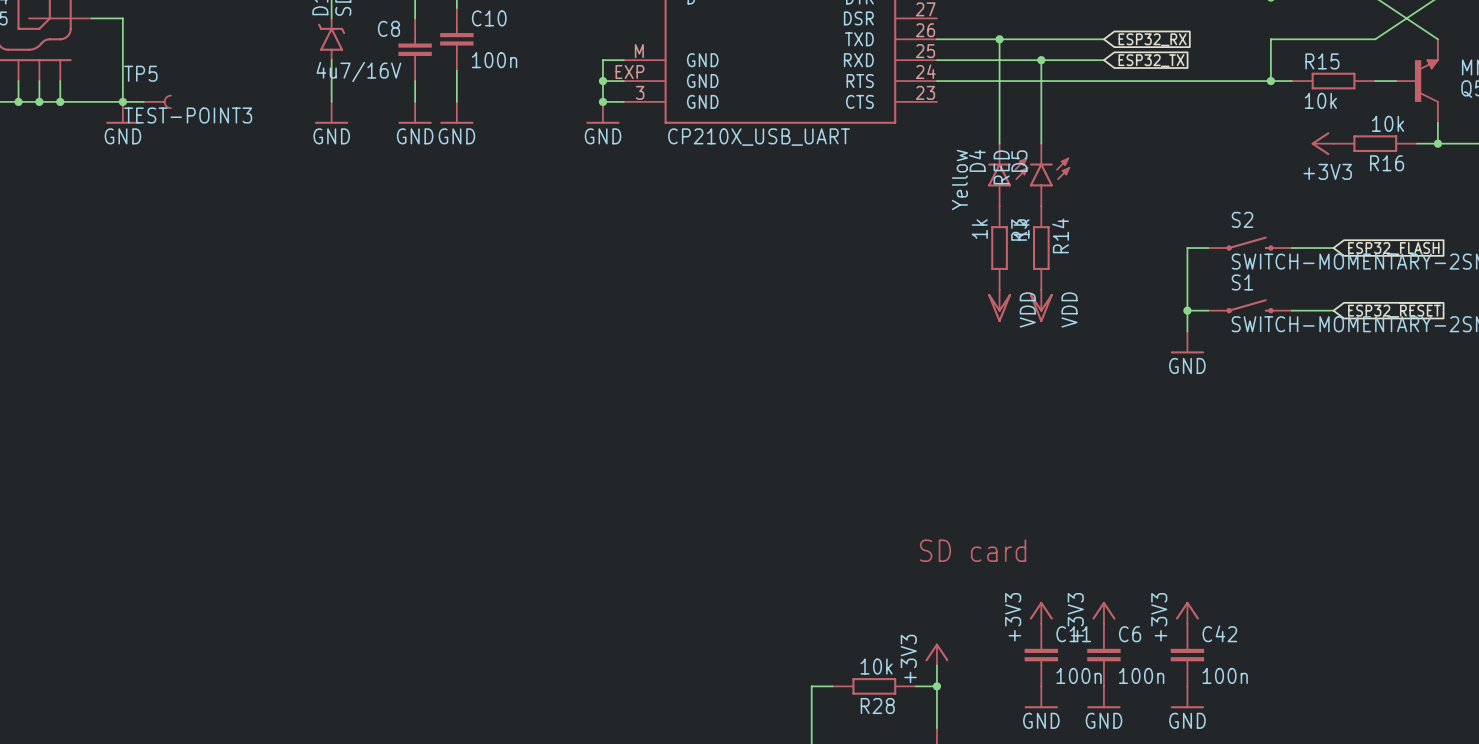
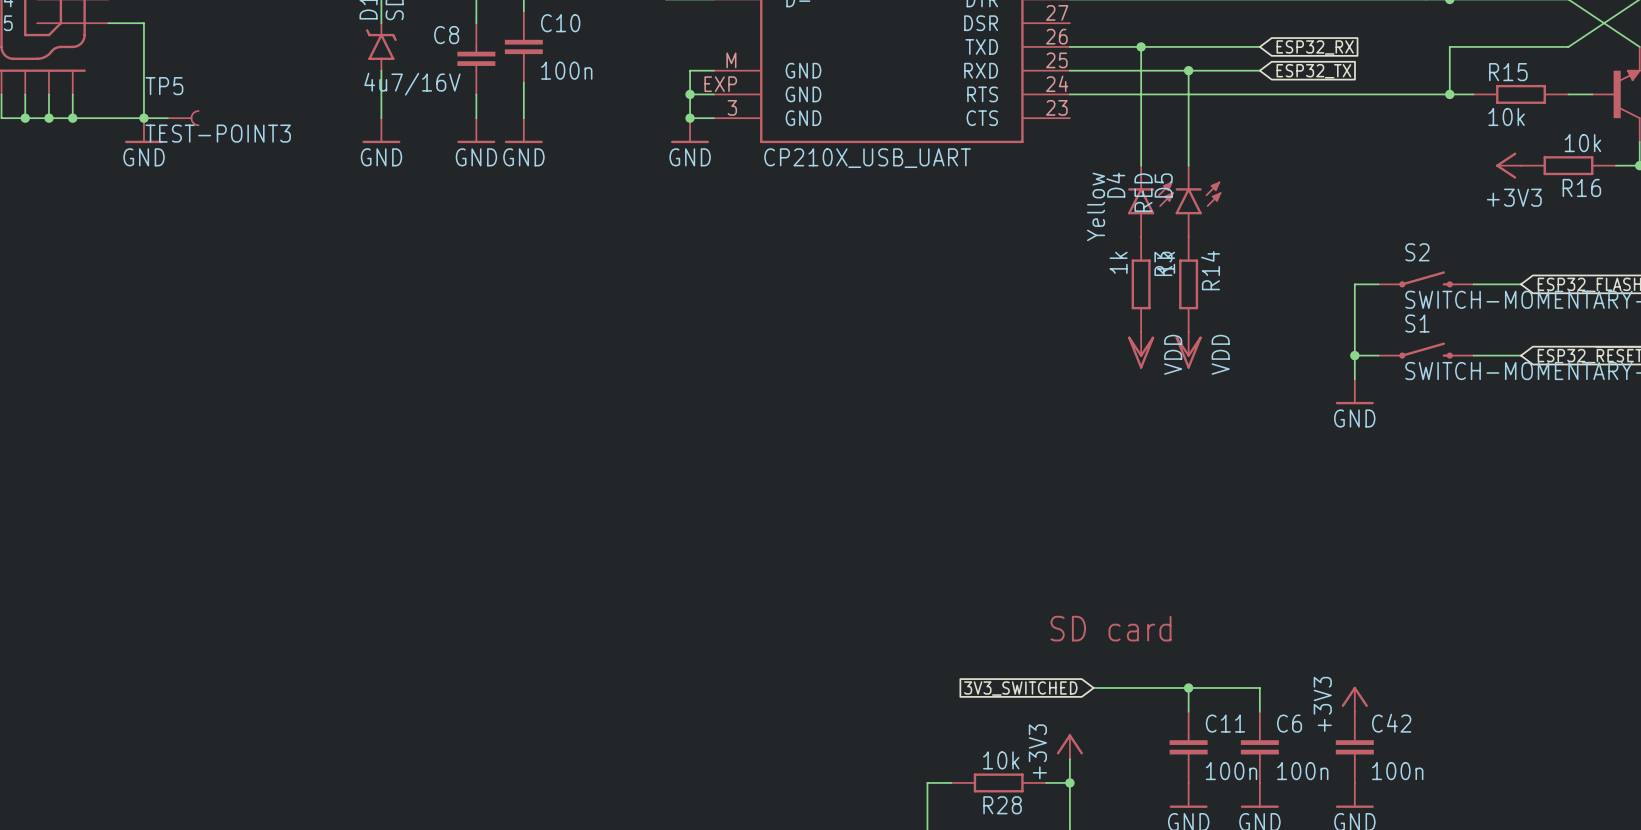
wire: none -> (1093, 687) (1259, 687) (1259, 711)
junction: none -> (1188, 687)
global label: none -> 3V3_SWITCHED (1020, 688)
power symbol: +3V3 (1041, 612) -> none
power symbol: +3V3 (1103, 612) -> none

